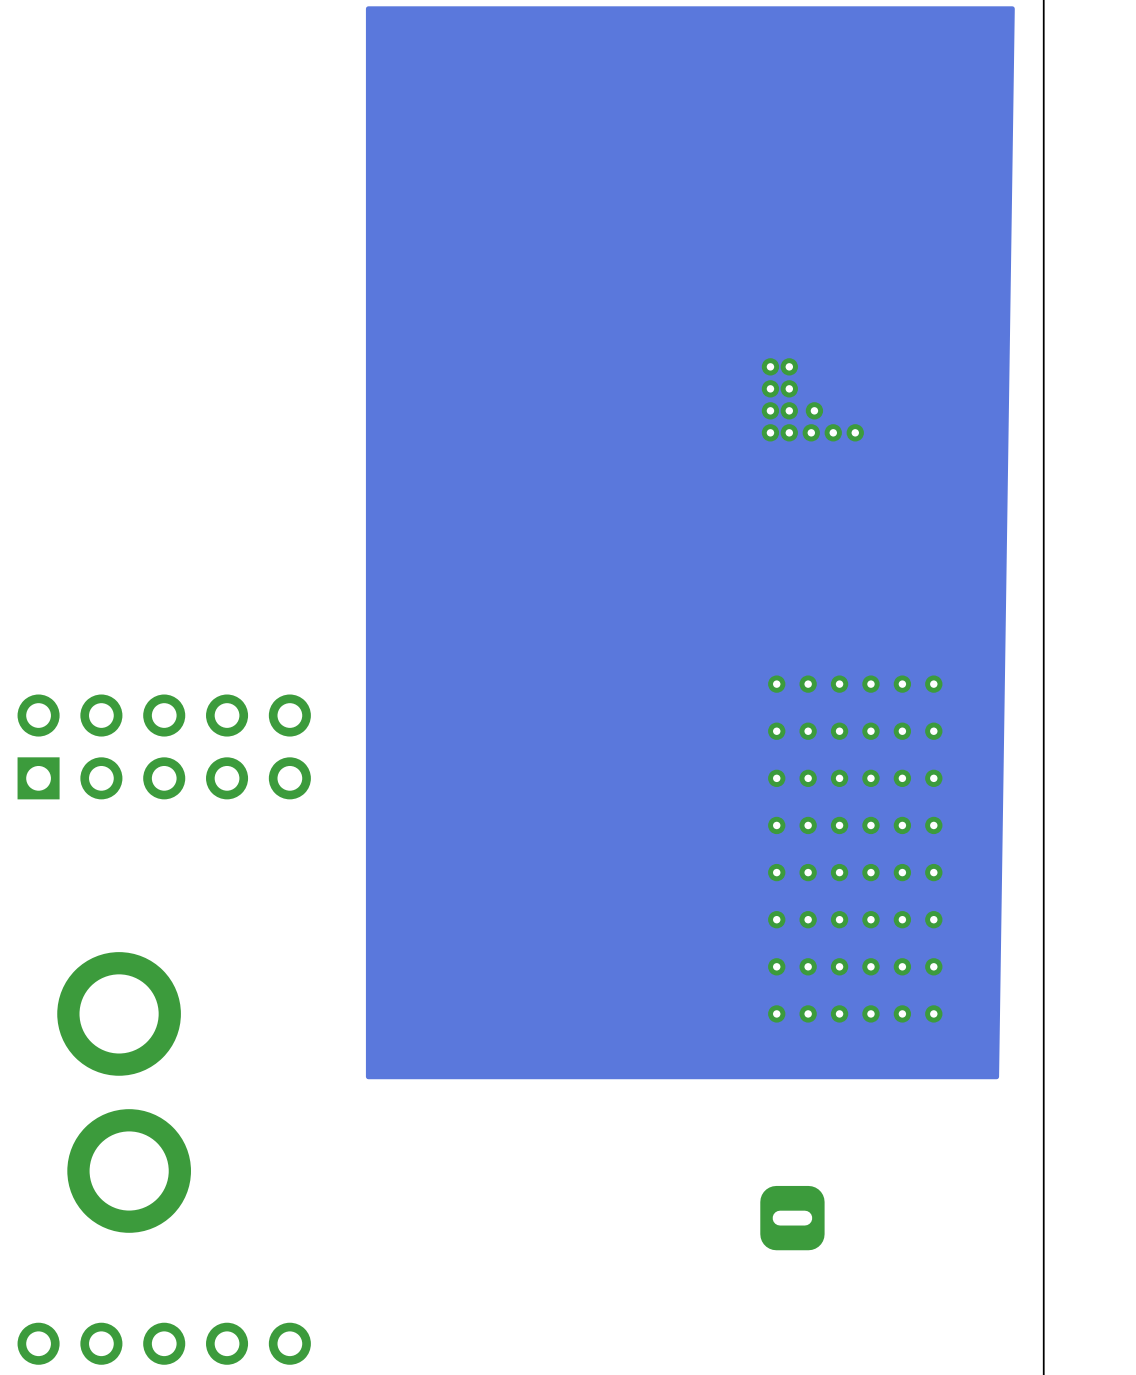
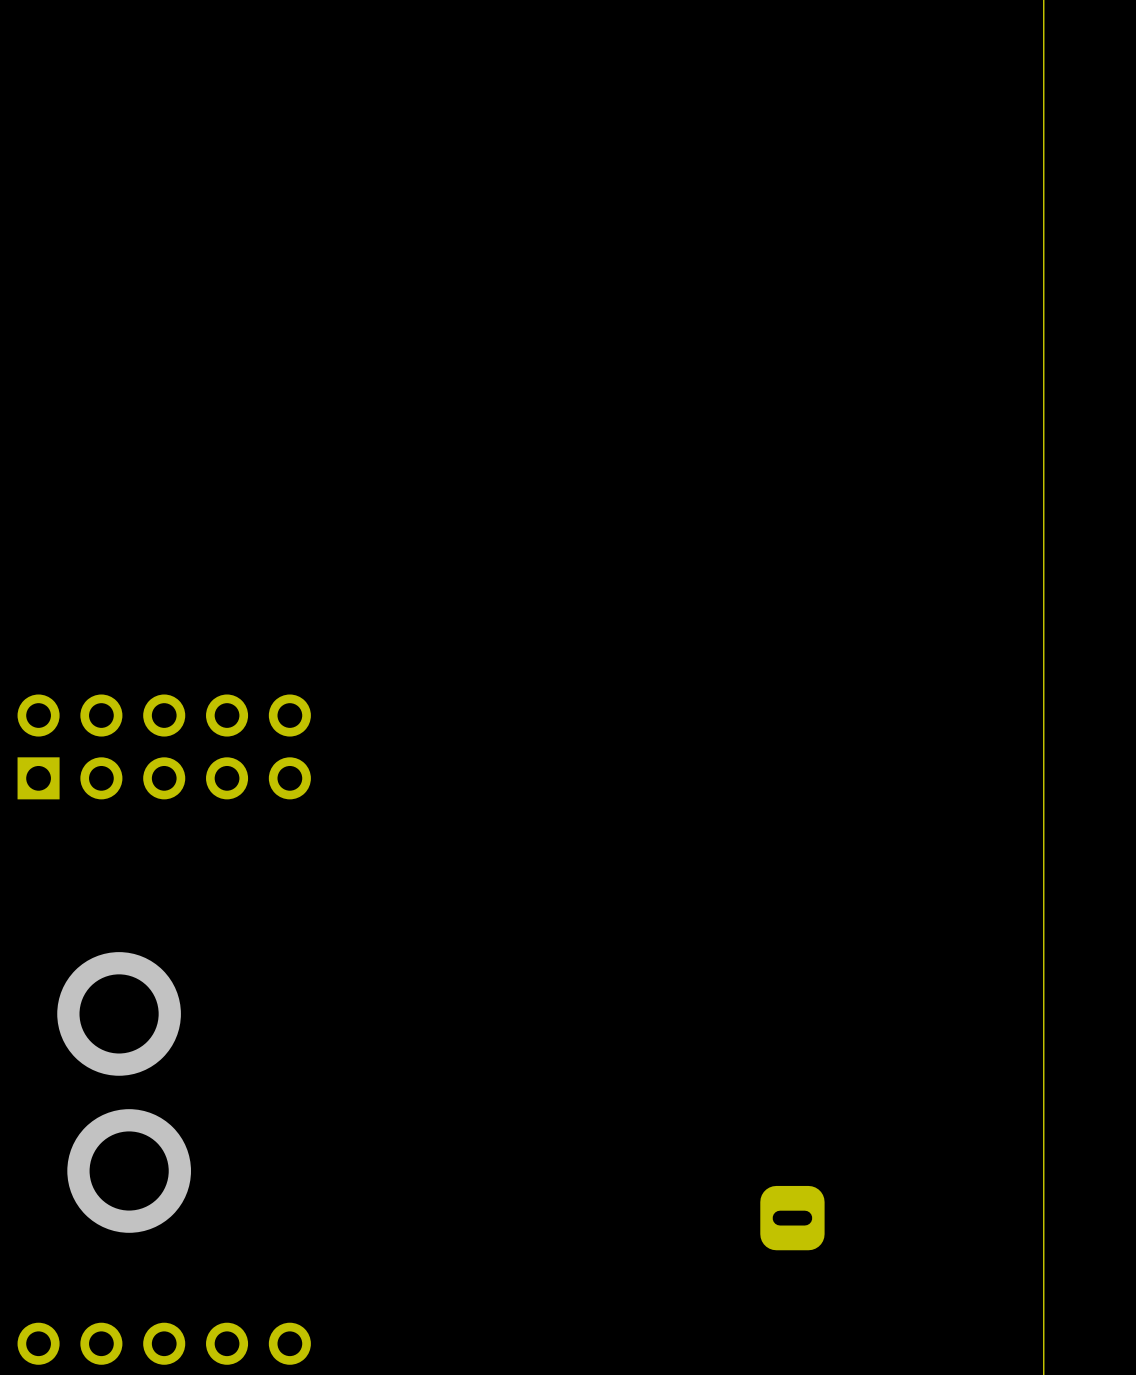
drawing: [365, 6, 1015, 1080] -> none
via: (770, 366) -> none
via: (789, 366) -> none
via: (770, 388) -> none
via: (789, 388) -> none
via: (770, 410) -> none
via: (789, 410) -> none
via: (814, 410) -> none
via: (770, 432) -> none
via: (789, 432) -> none
via: (811, 432) -> none
via: (833, 432) -> none
via: (855, 432) -> none
via: (776, 684) -> none
via: (808, 684) -> none
via: (839, 684) -> none
via: (870, 684) -> none
via: (902, 684) -> none
via: (933, 684) -> none
via: (776, 731) -> none
via: (808, 731) -> none
via: (839, 731) -> none
via: (870, 731) -> none
via: (902, 731) -> none
via: (933, 731) -> none
via: (776, 778) -> none
via: (808, 778) -> none
via: (839, 778) -> none
via: (870, 778) -> none
via: (902, 778) -> none
via: (933, 778) -> none
via: (776, 825) -> none
via: (808, 825) -> none
via: (839, 825) -> none
via: (870, 825) -> none
via: (902, 825) -> none
via: (933, 825) -> none
via: (776, 872) -> none
via: (808, 872) -> none
via: (839, 872) -> none
via: (870, 872) -> none
via: (902, 872) -> none
via: (933, 872) -> none
via: (776, 919) -> none
via: (808, 919) -> none
via: (839, 919) -> none
via: (870, 919) -> none
via: (902, 919) -> none
via: (933, 919) -> none
via: (776, 966) -> none
via: (808, 966) -> none
via: (839, 966) -> none
via: (870, 966) -> none
via: (902, 966) -> none
via: (933, 966) -> none
via: (776, 1013) -> none
via: (808, 1013) -> none
via: (839, 1013) -> none
via: (870, 1013) -> none
via: (902, 1013) -> none
via: (933, 1013) -> none

